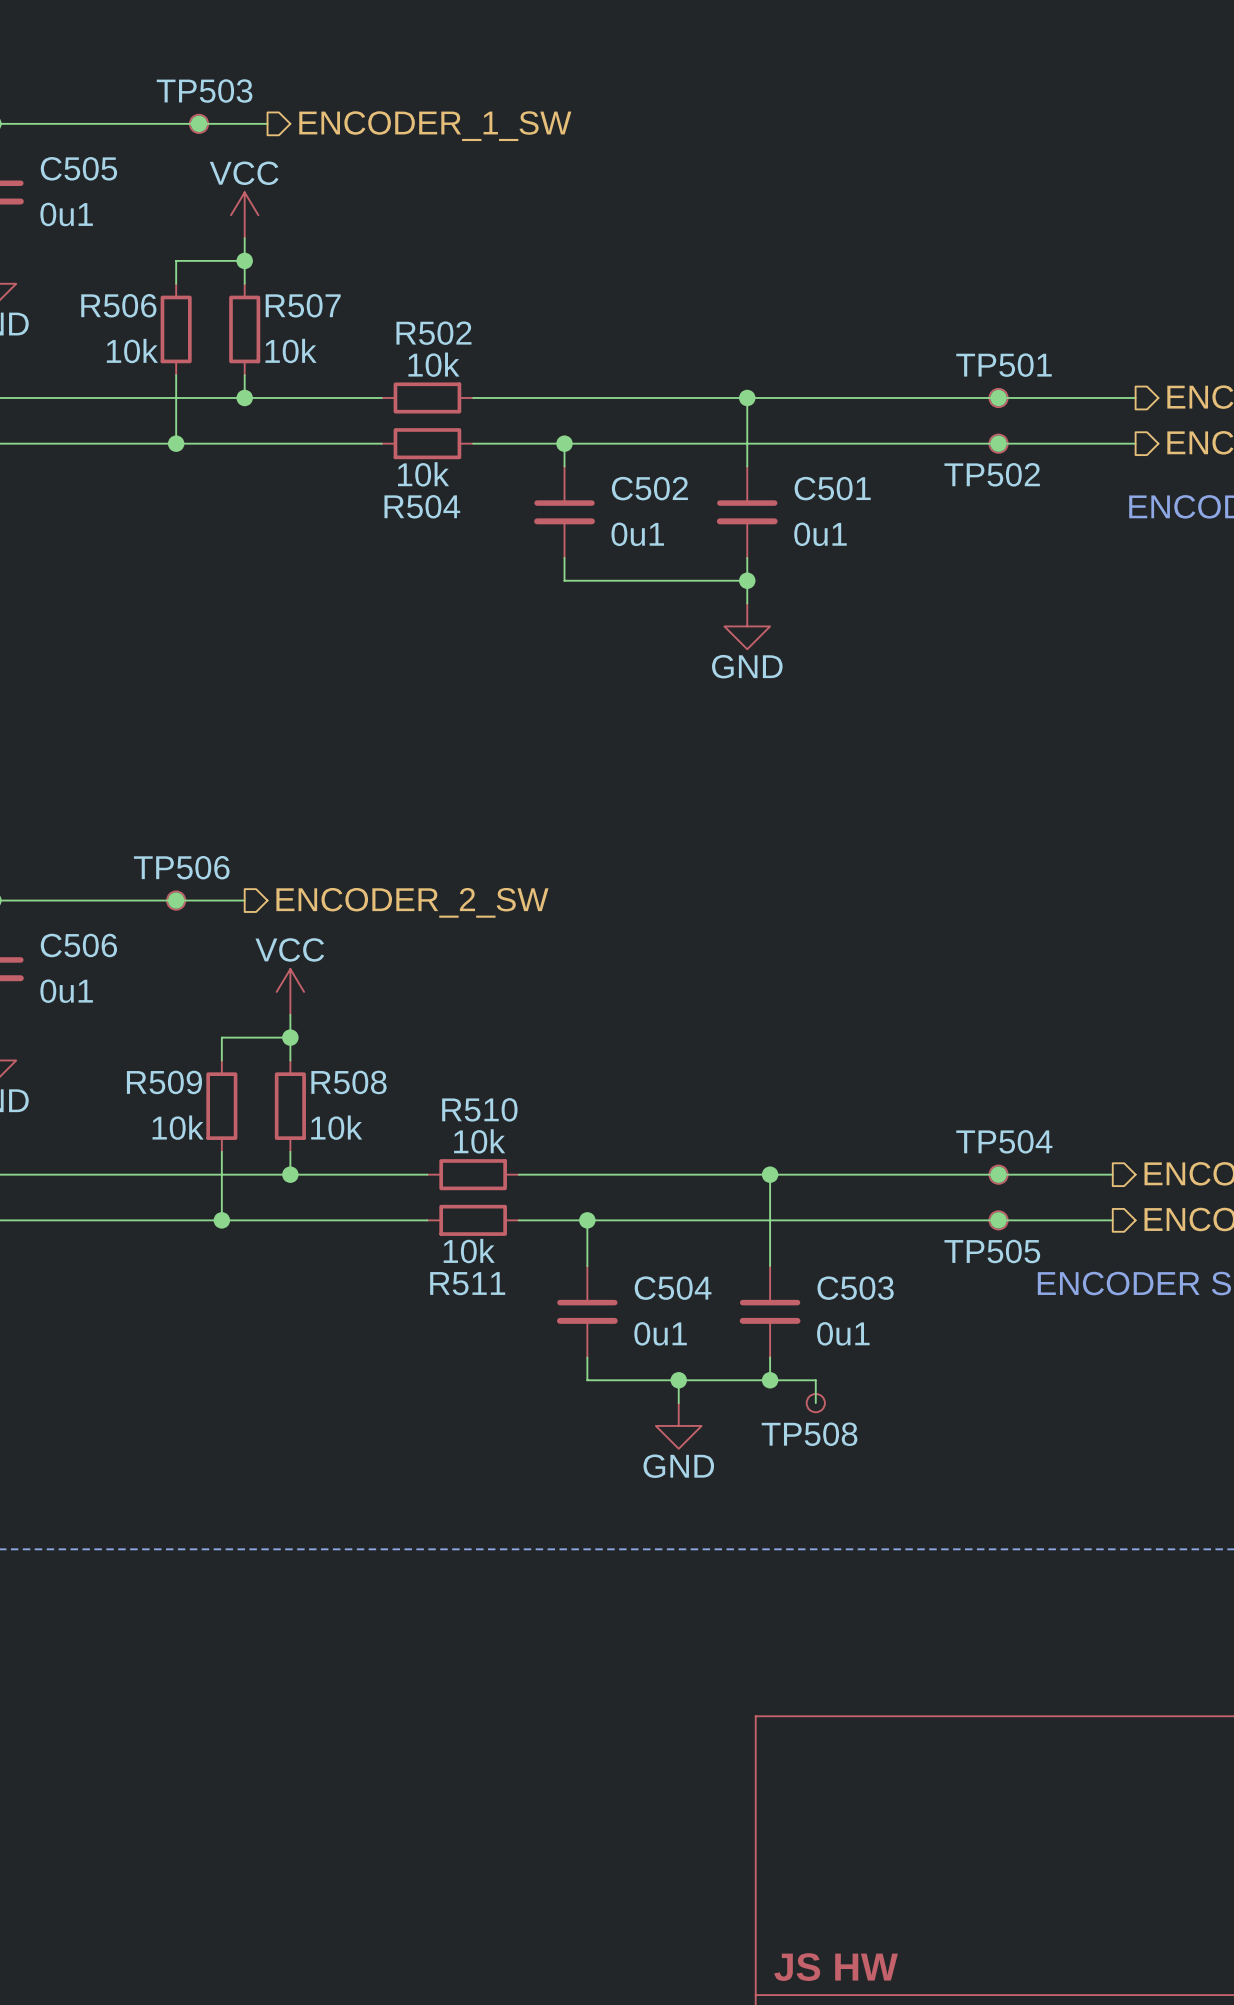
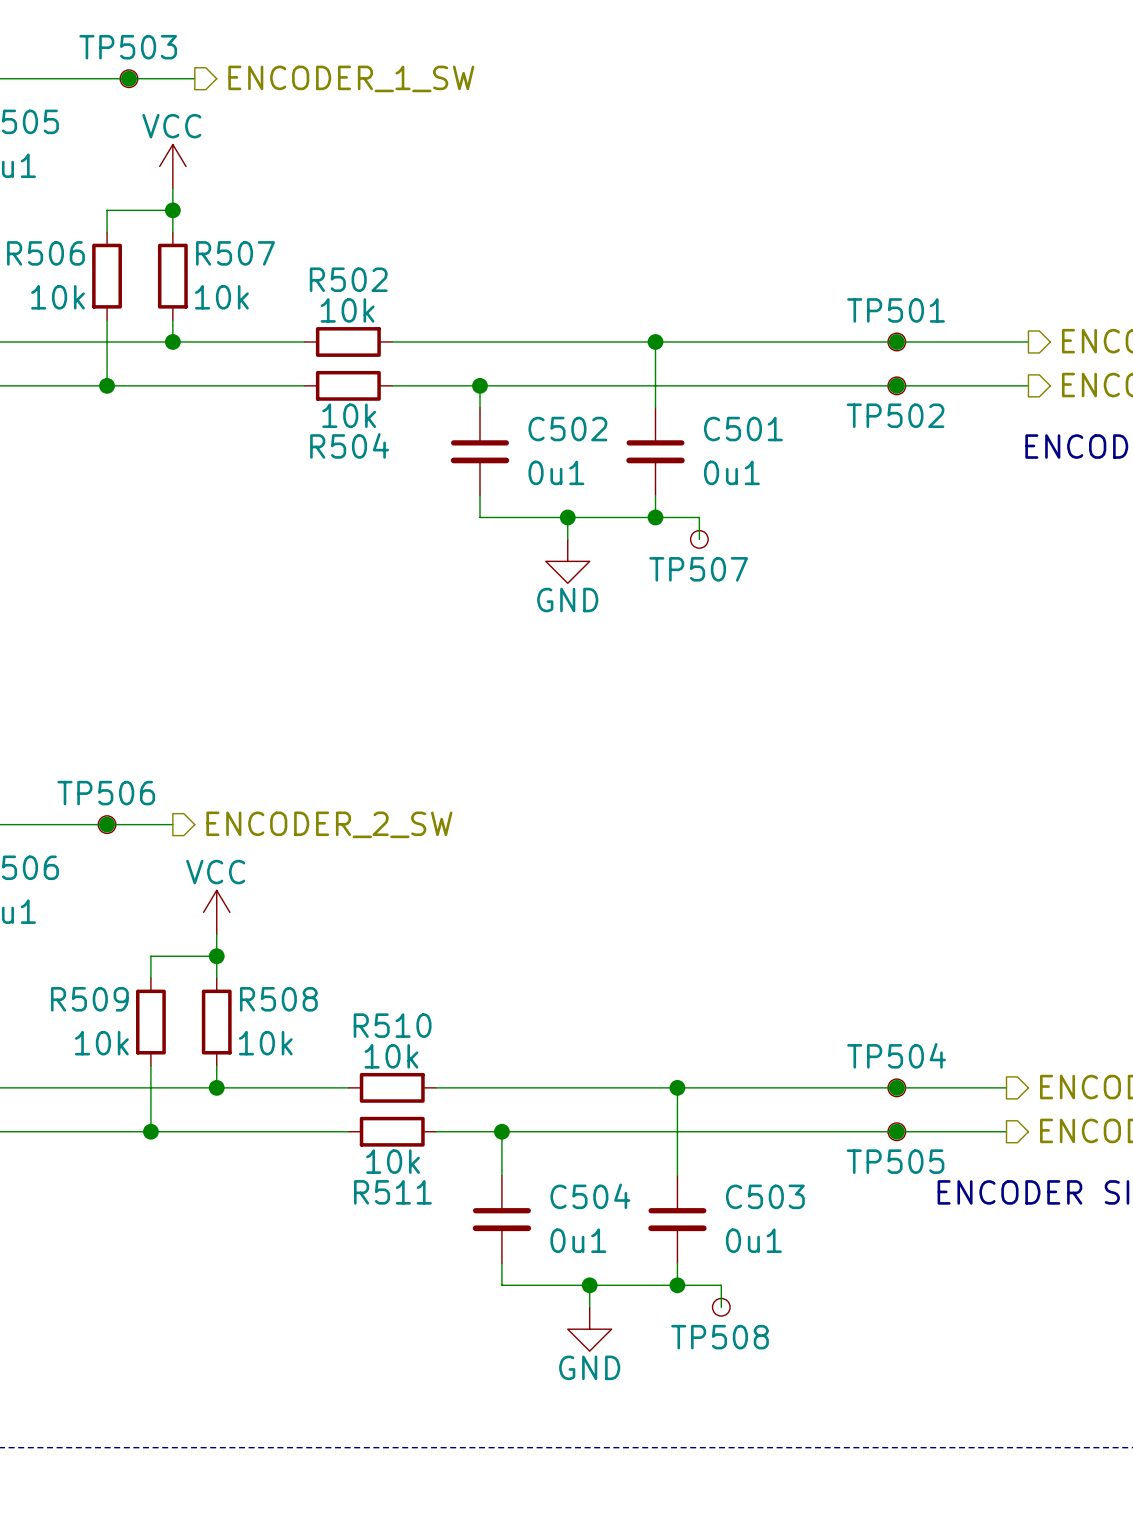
wire: none -> (567, 517) (567, 539)
junction: none -> (567, 517)
wire: (747, 580) (747, 603) -> (655, 517) (699, 517) (699, 539)
TP507: none -> (699, 539)
power symbol position: GND (747, 626) -> GND (567, 561)

